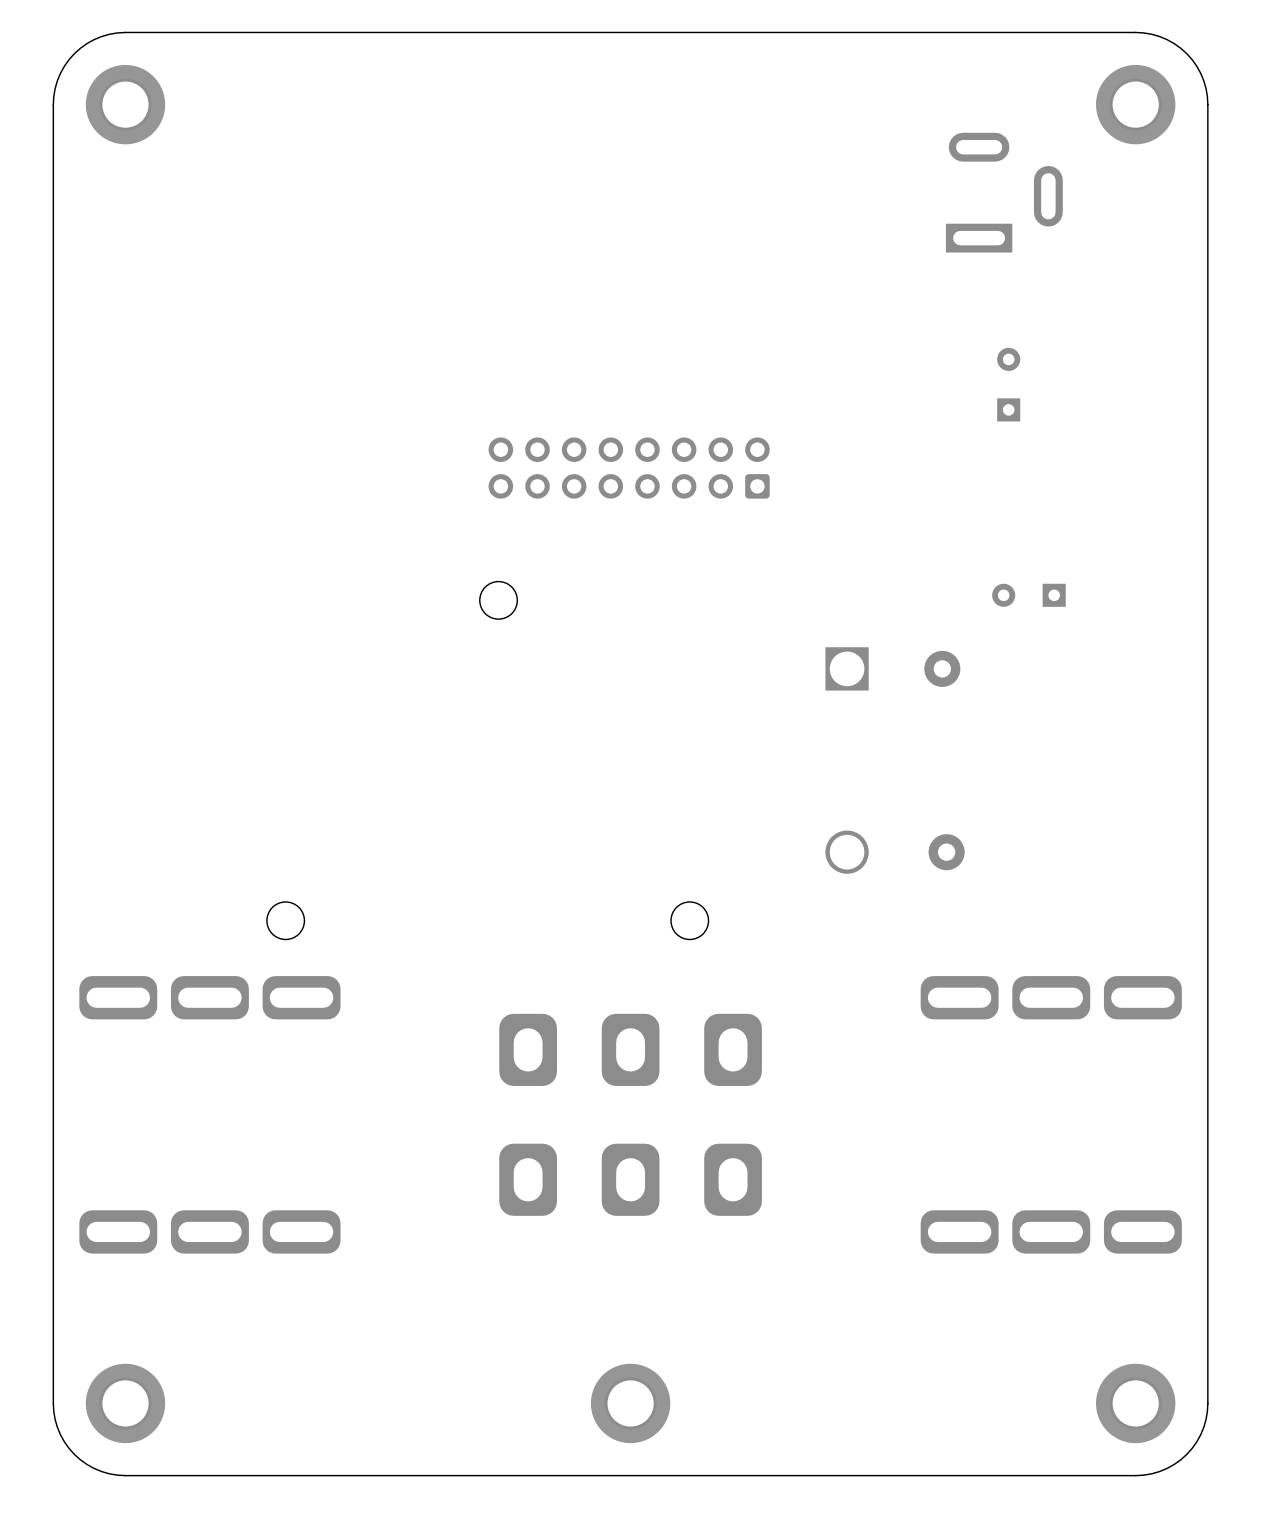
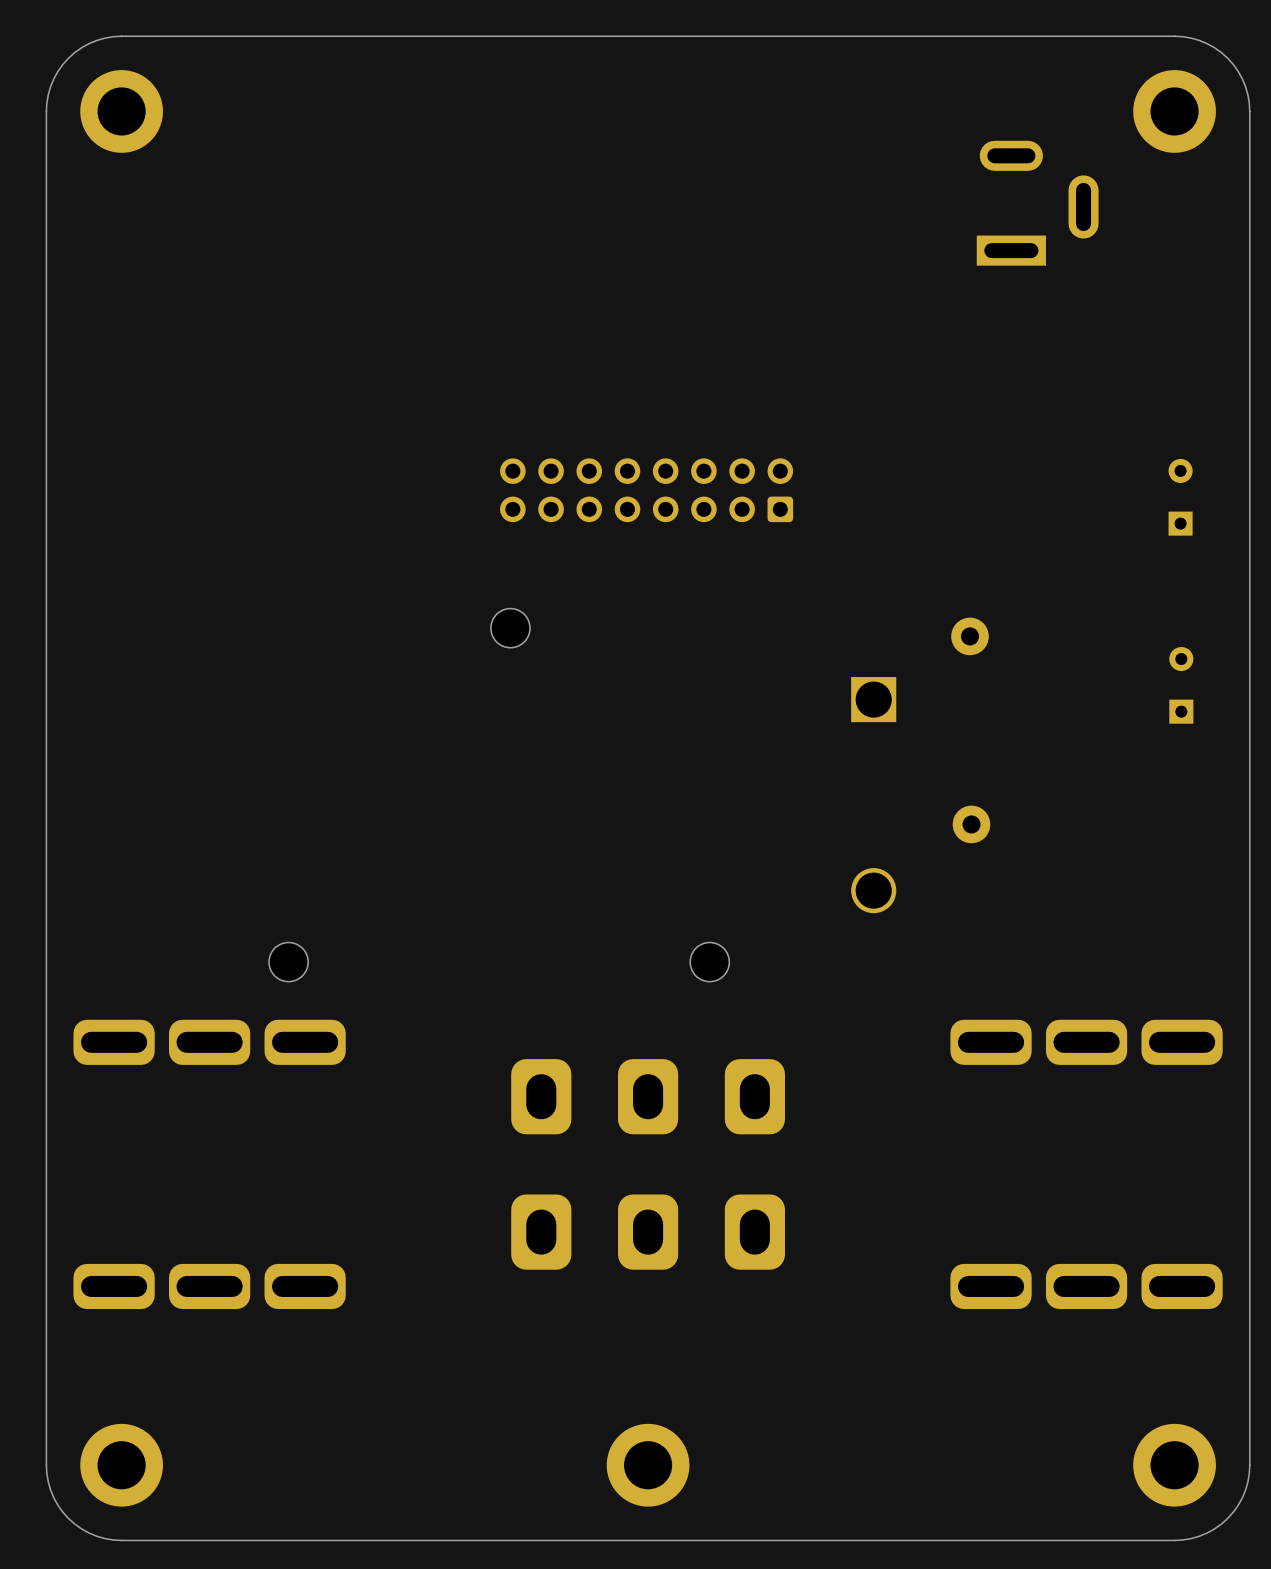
part: (1008, 384) -> none
part: none -> (1180, 497)
part: (1028, 595) -> none
part: none -> (969, 636)
part: none -> (1181, 685)
part: (942, 668) -> none
part: none -> (971, 824)
part: (946, 852) -> none

